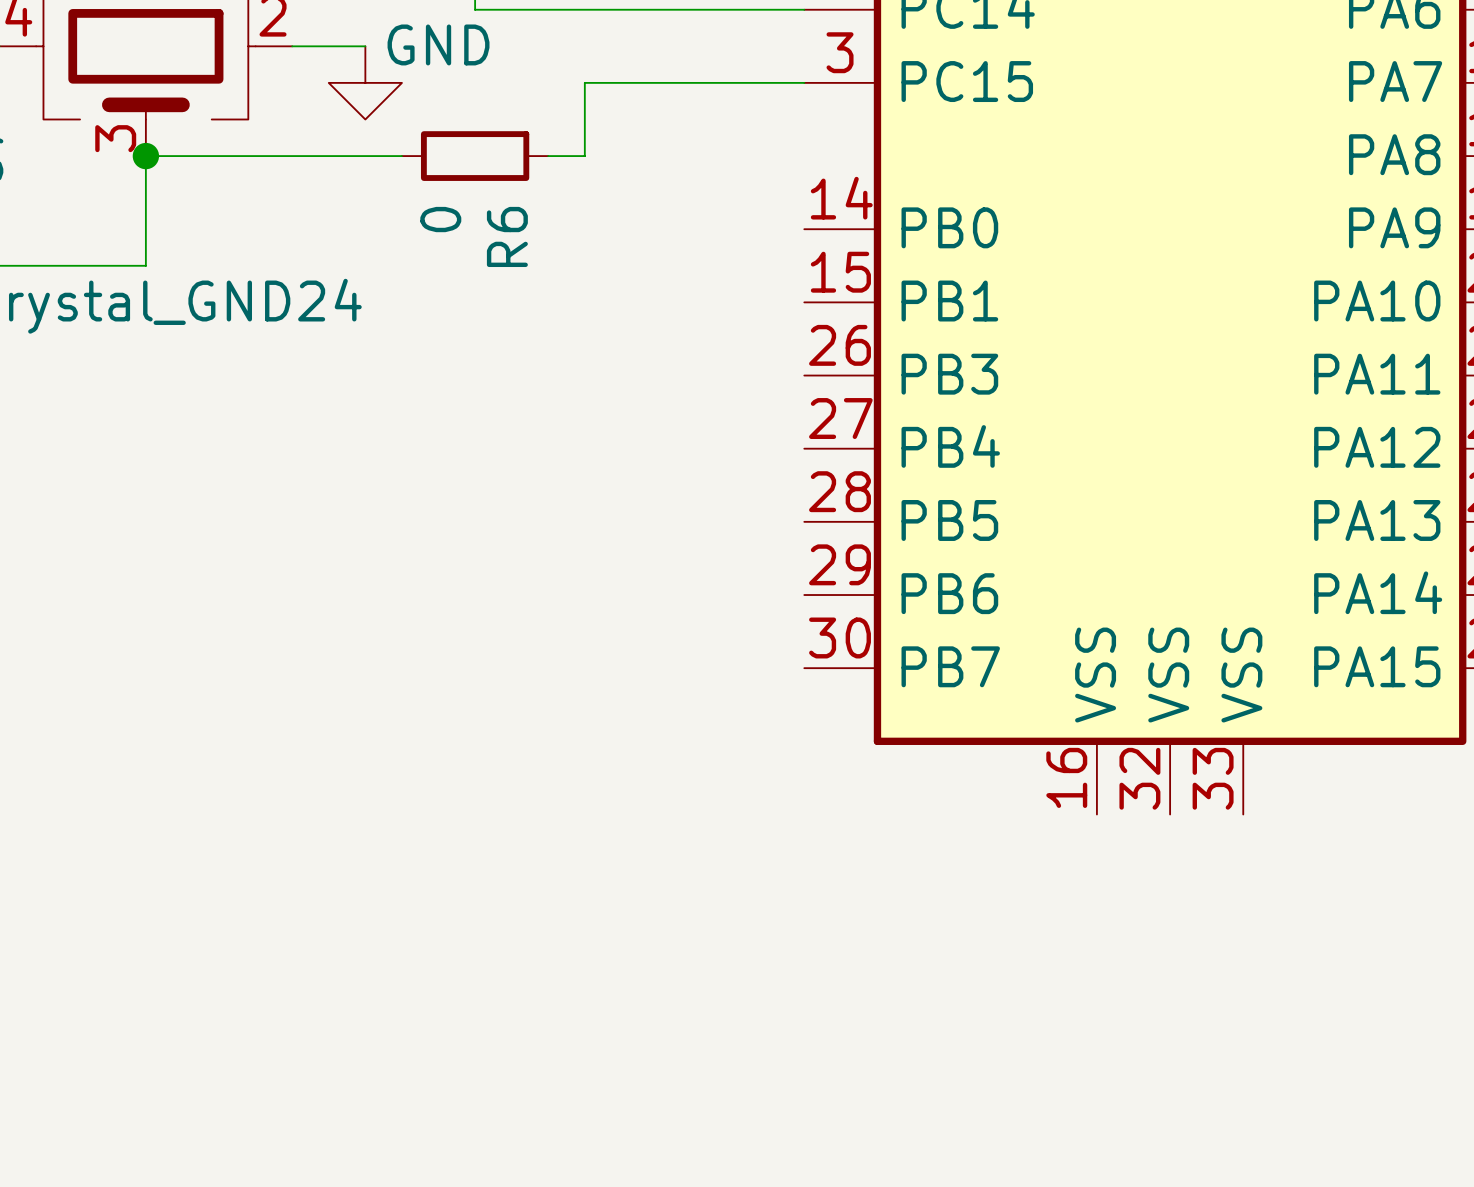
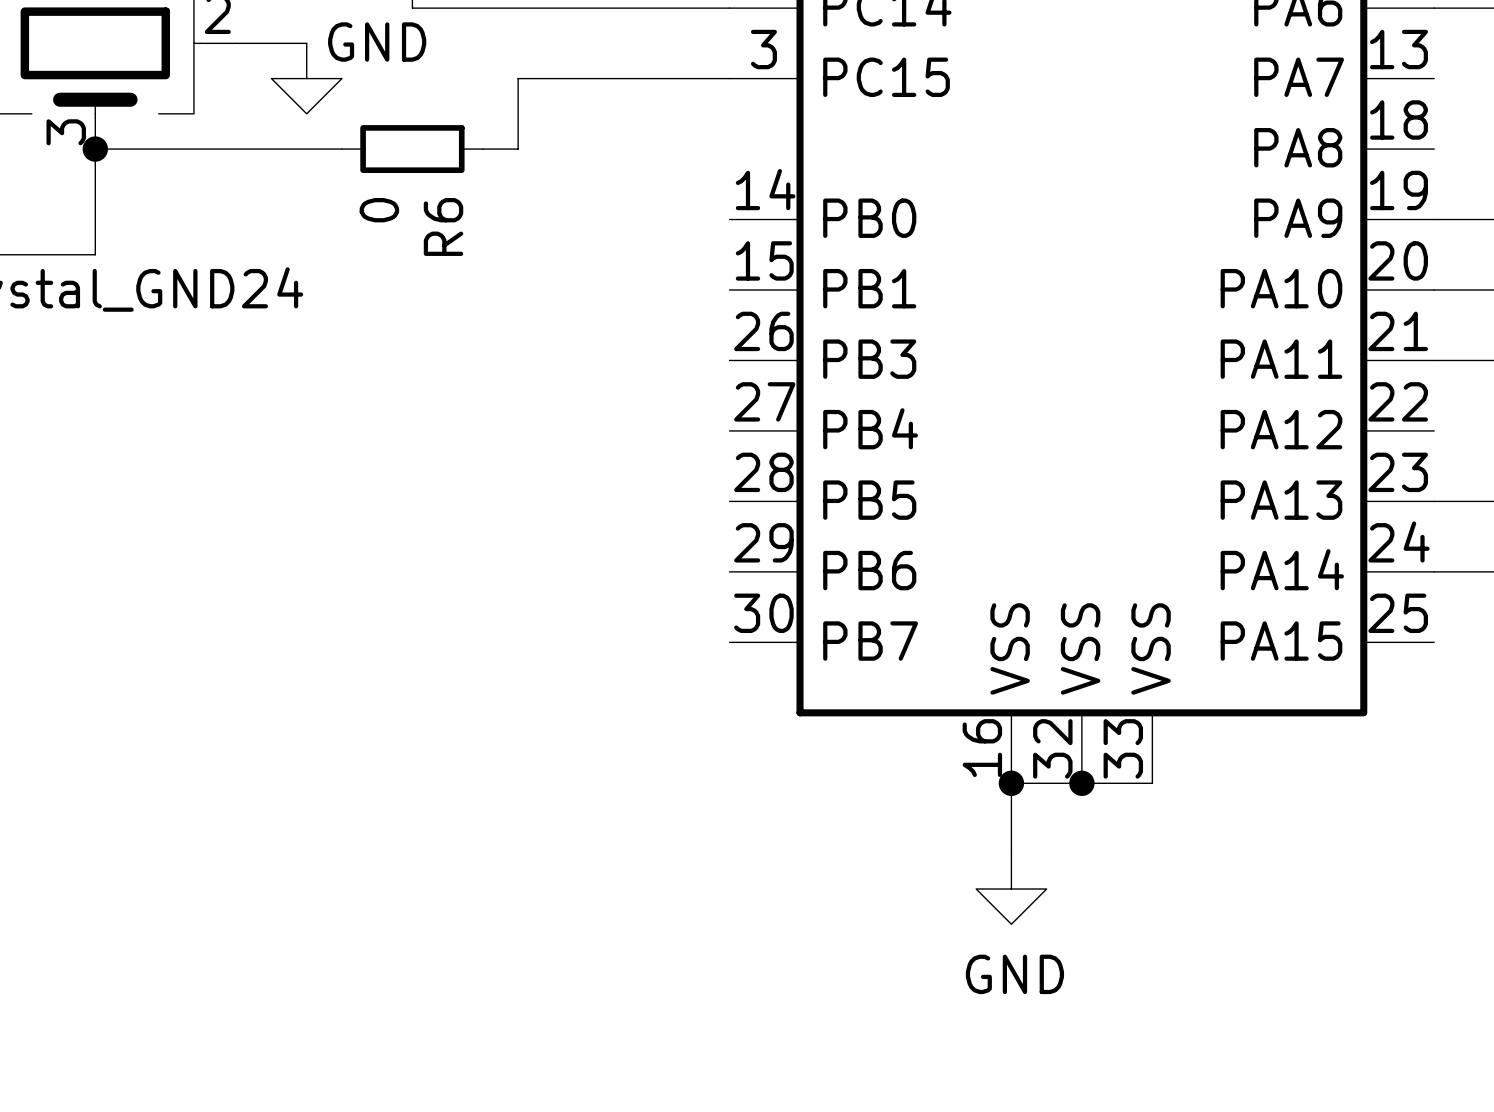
junction: none -> (1011, 783)
junction: none -> (1081, 783)
wire: none -> (1152, 783) (1011, 783) (1011, 853)
power symbol: none -> GND (1011, 889)

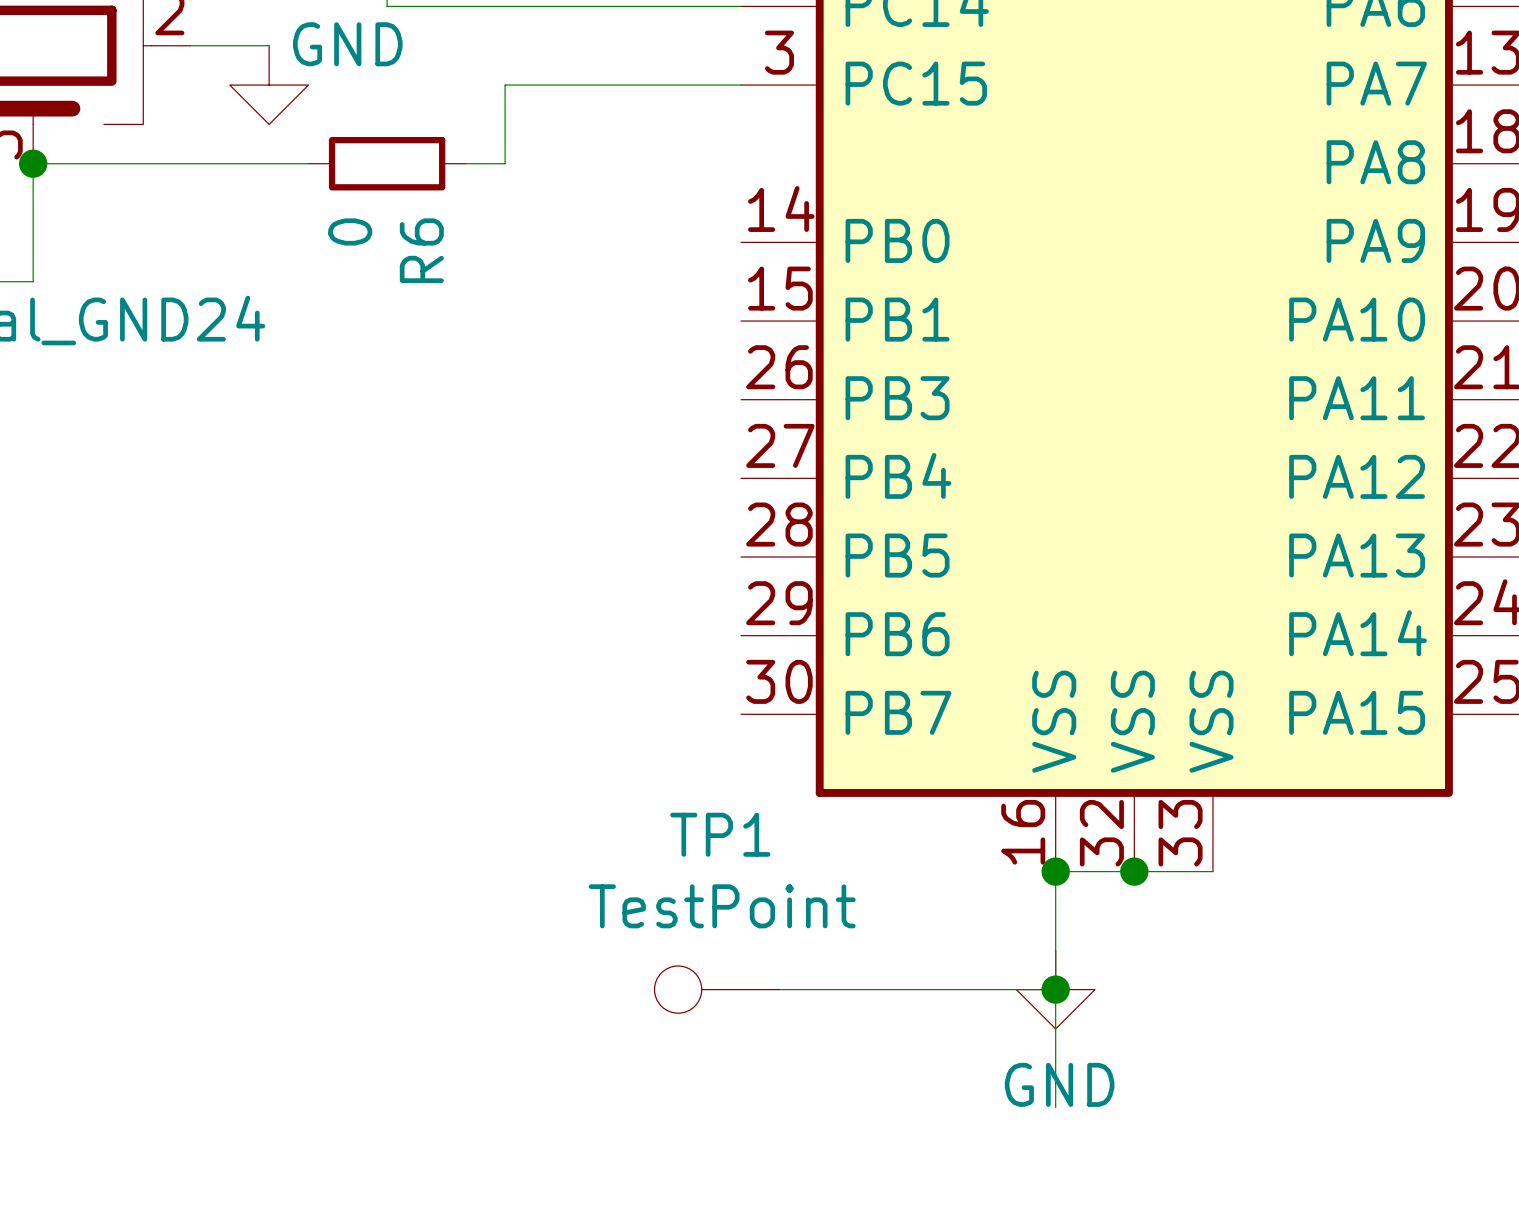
wire: none -> (1055, 950) (1055, 1107)
TP1: none -> TestPoint (717, 989)
wire: none -> (780, 989) (1055, 989)
junction: none -> (1055, 989)

